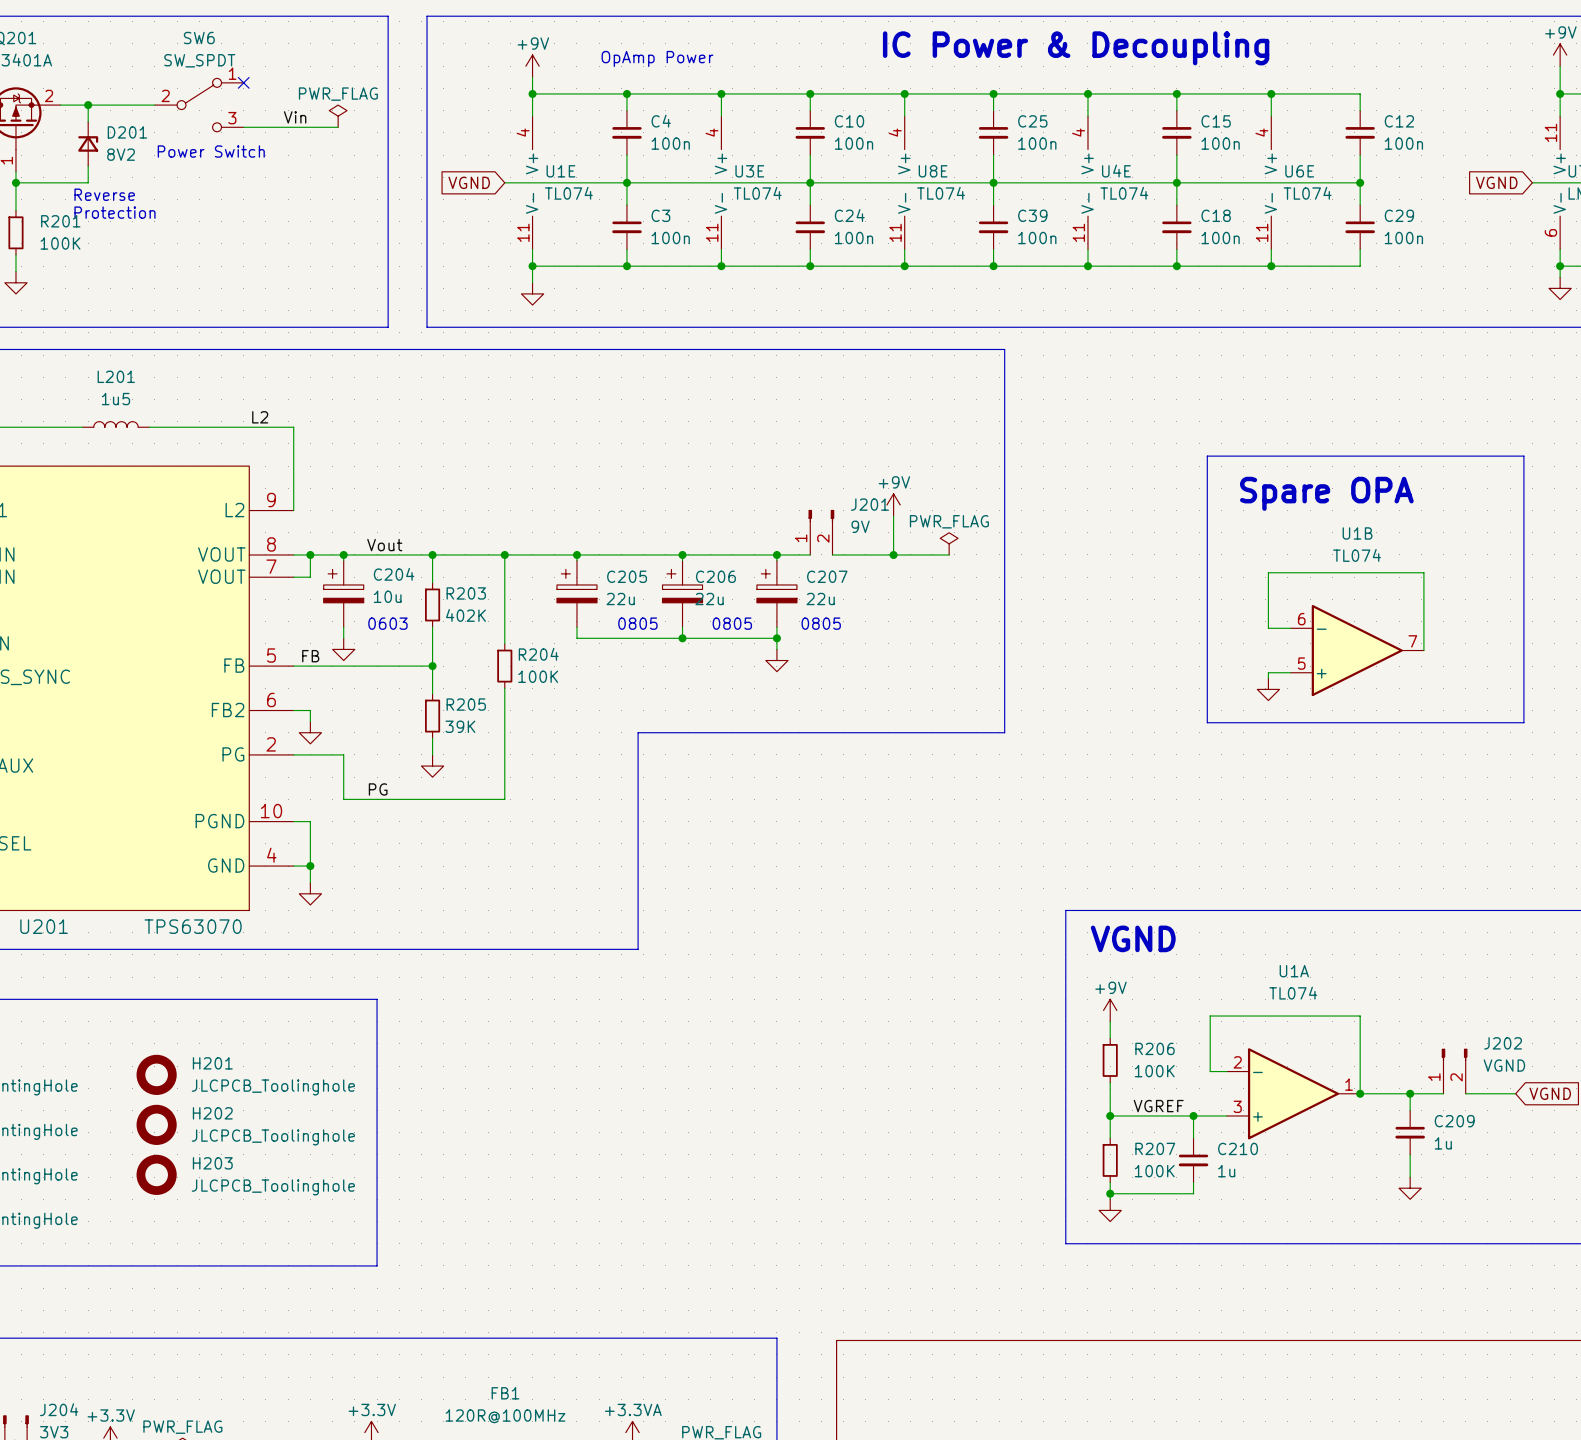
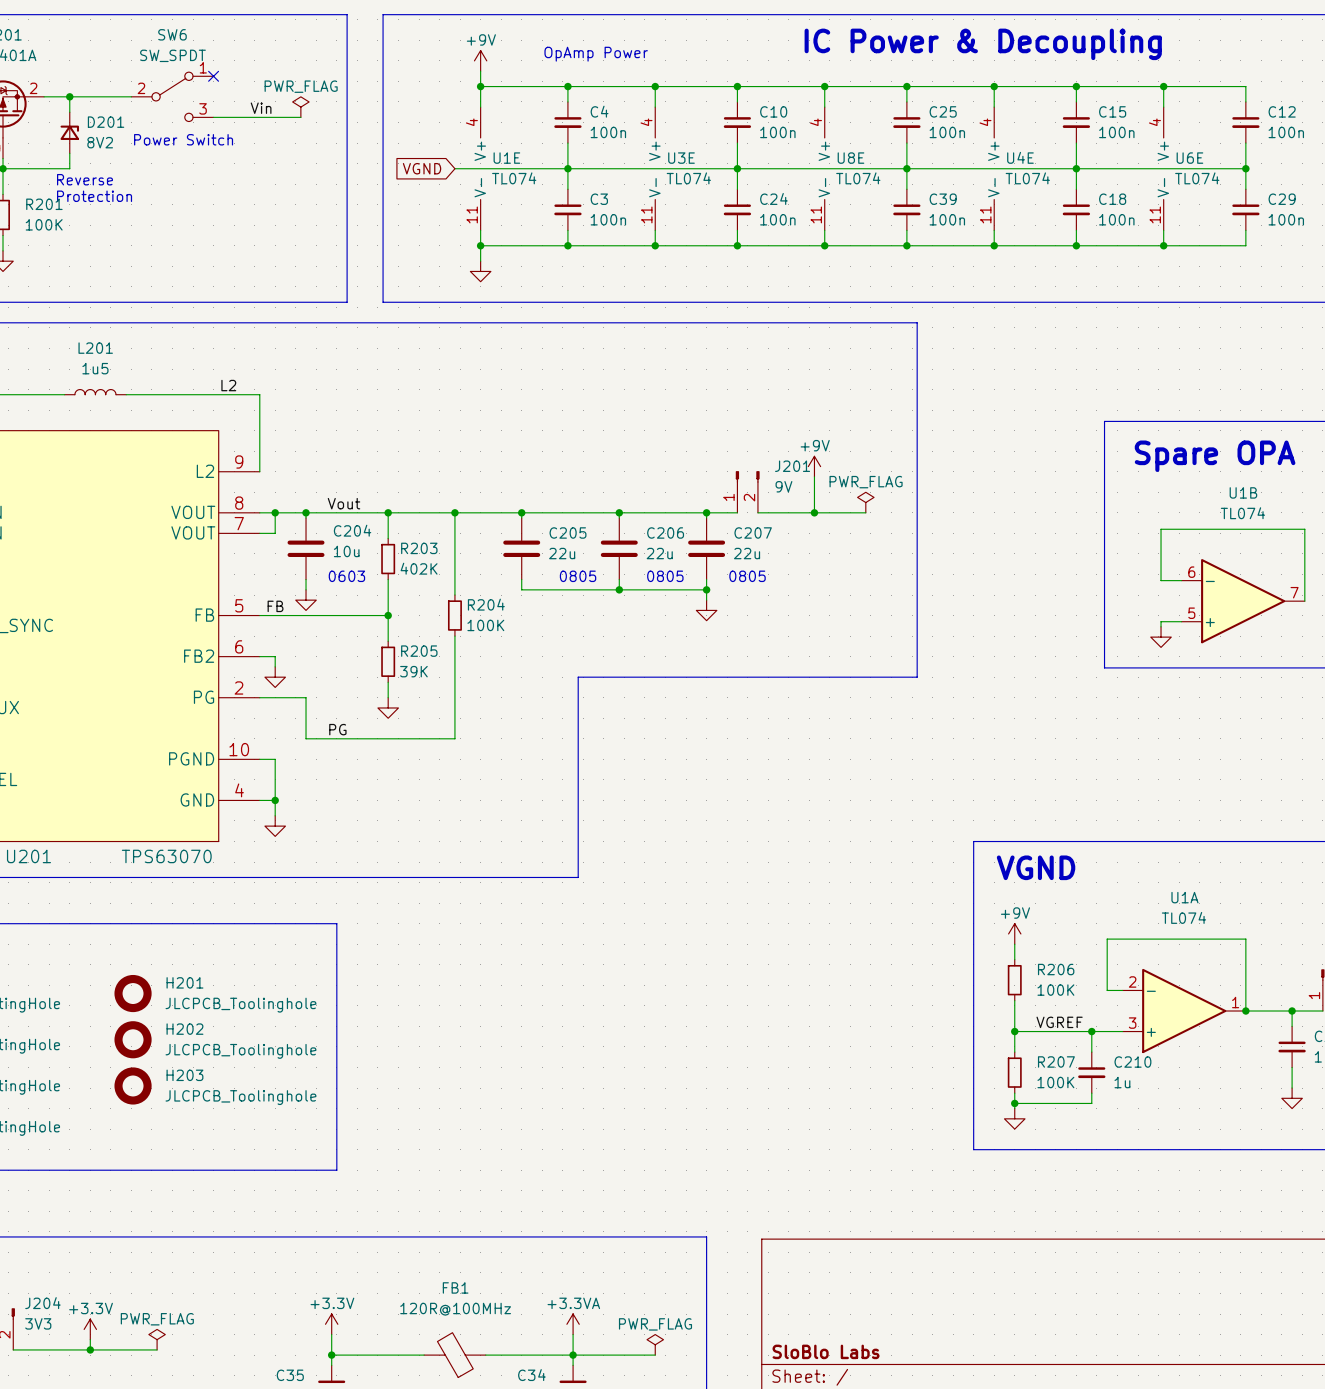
C204 symbol: [323, 560, 364, 628] -> [287, 517, 325, 580]
C205 symbol: [556, 560, 597, 628] -> [503, 517, 541, 580]
C206 symbol: [662, 560, 703, 628] -> [600, 517, 638, 580]
C207 symbol: [756, 560, 797, 628] -> [688, 517, 726, 580]

